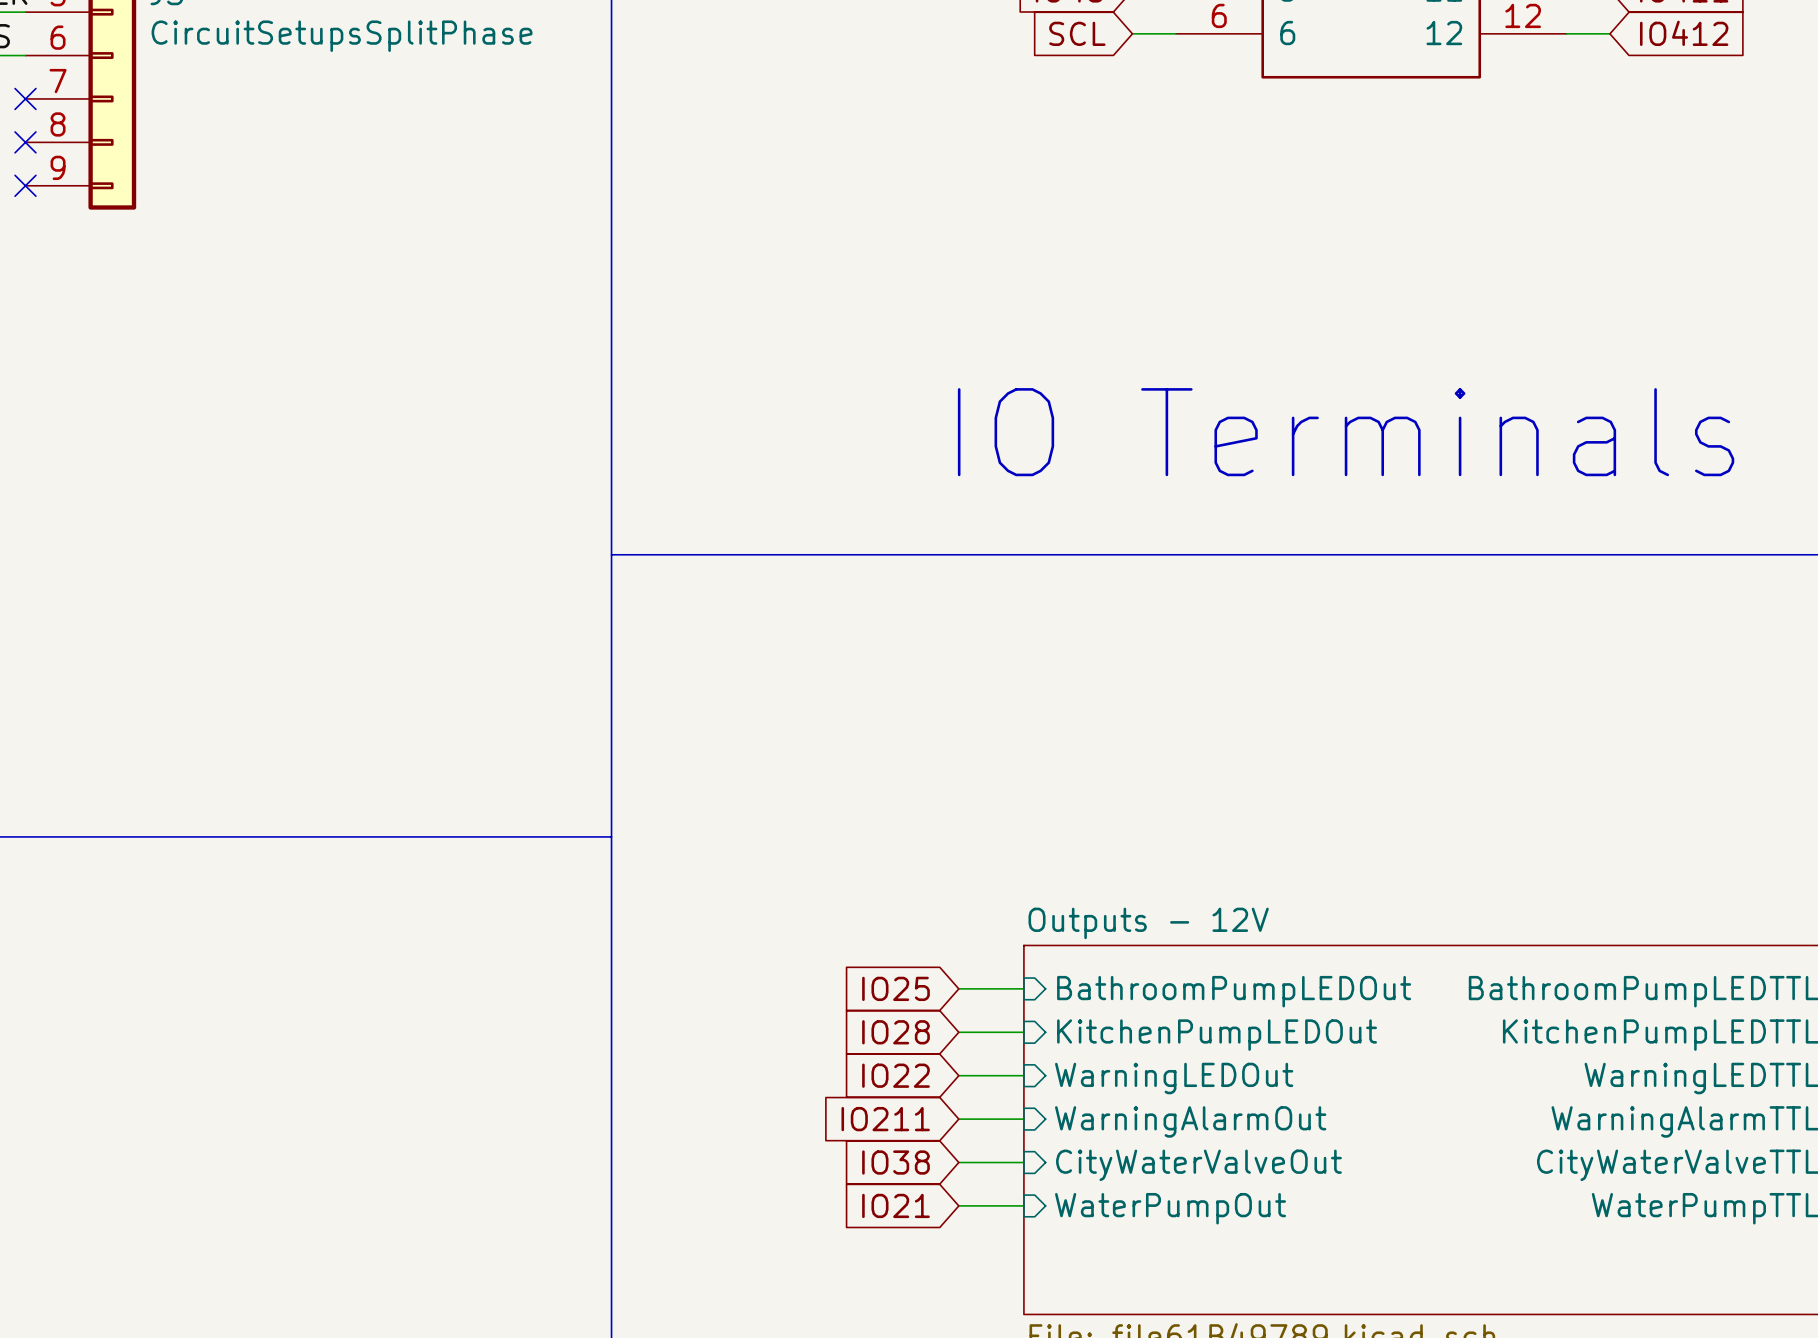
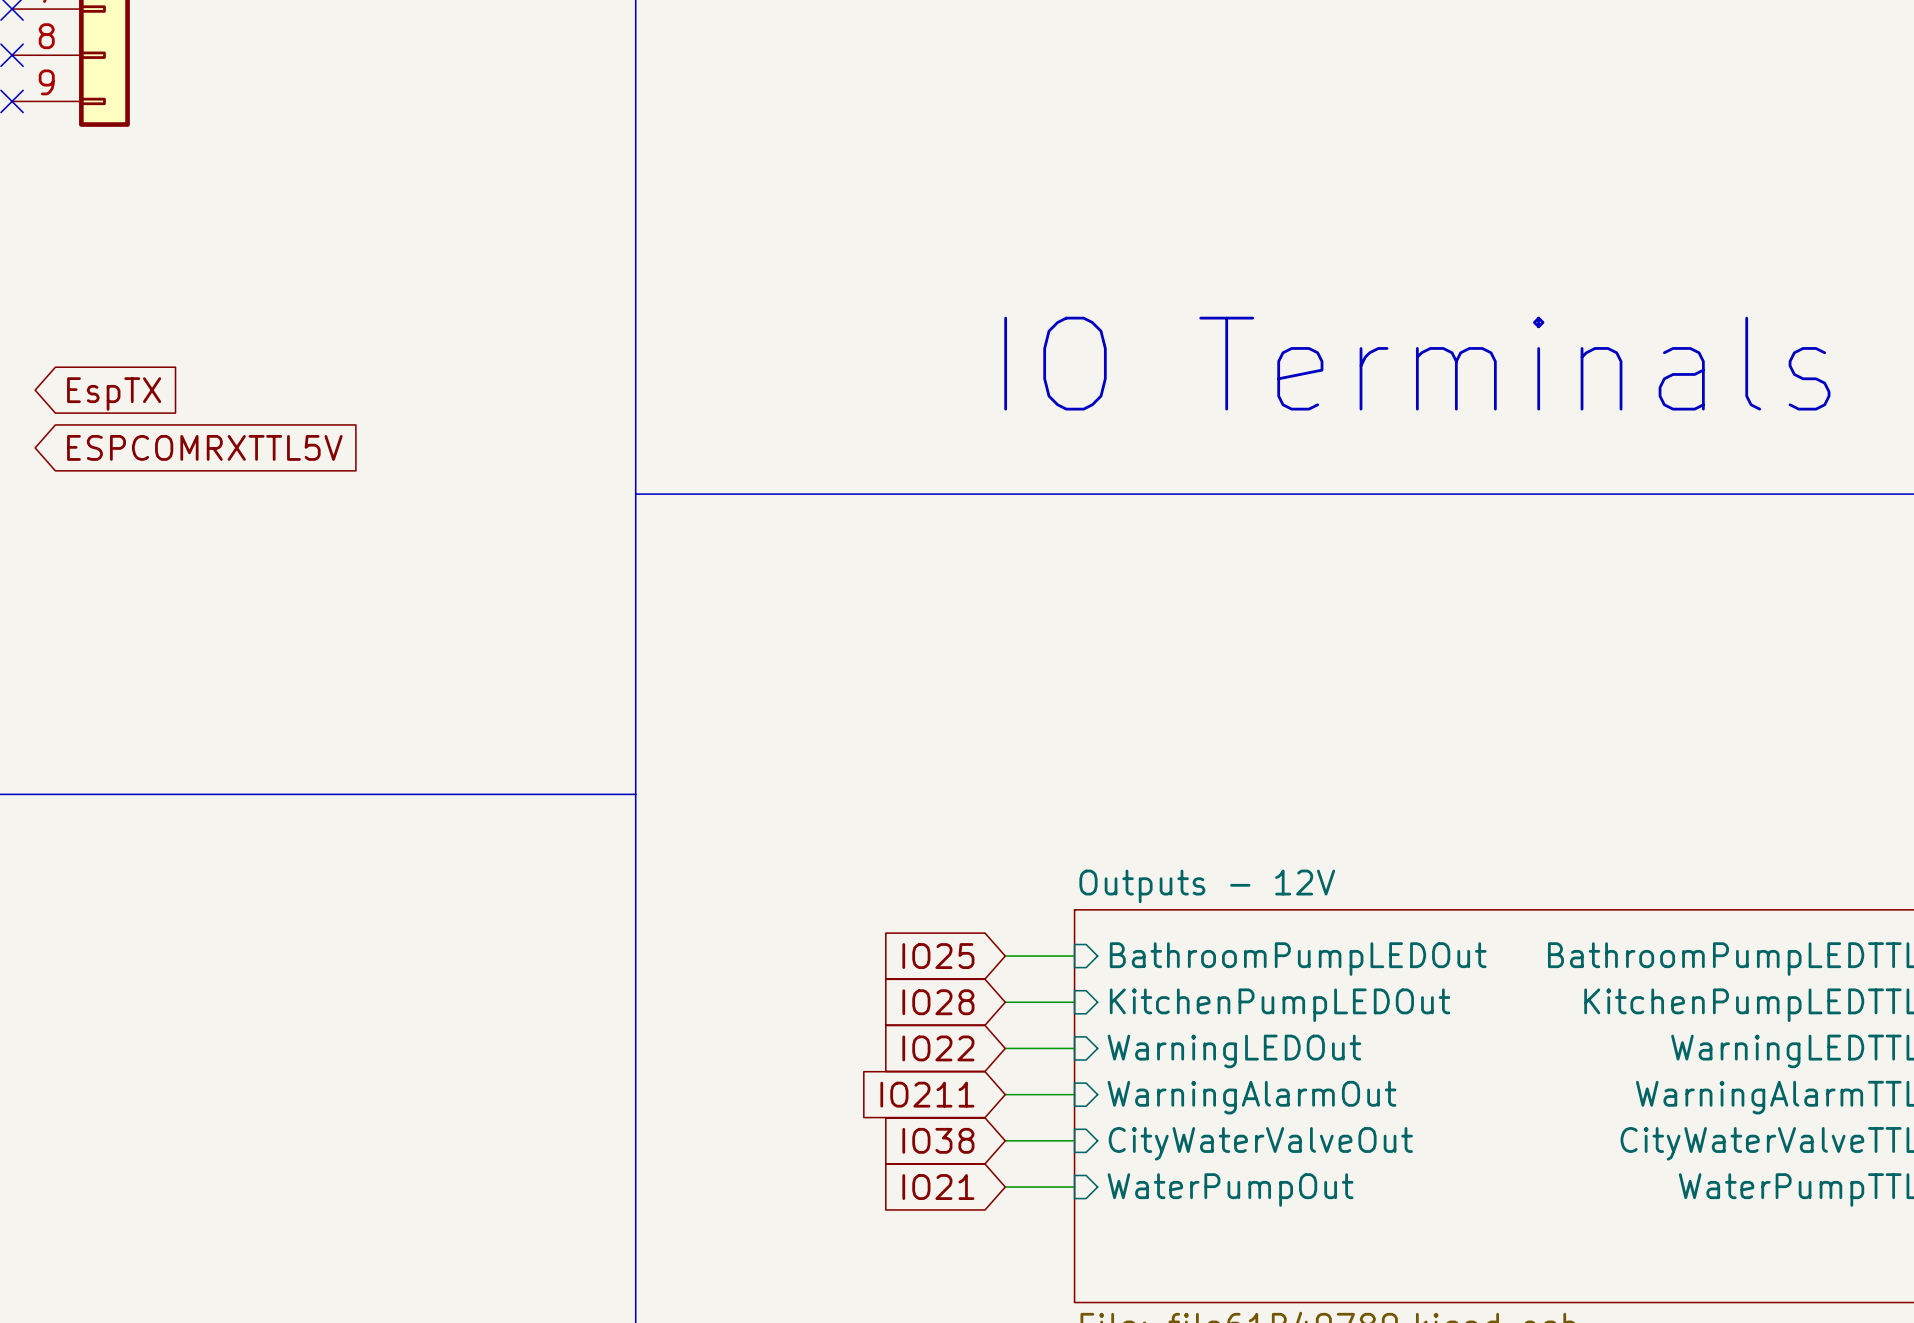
global label: none -> EspTX (114, 394)
global label: none -> ESPCOMRXTTL5V (204, 447)

